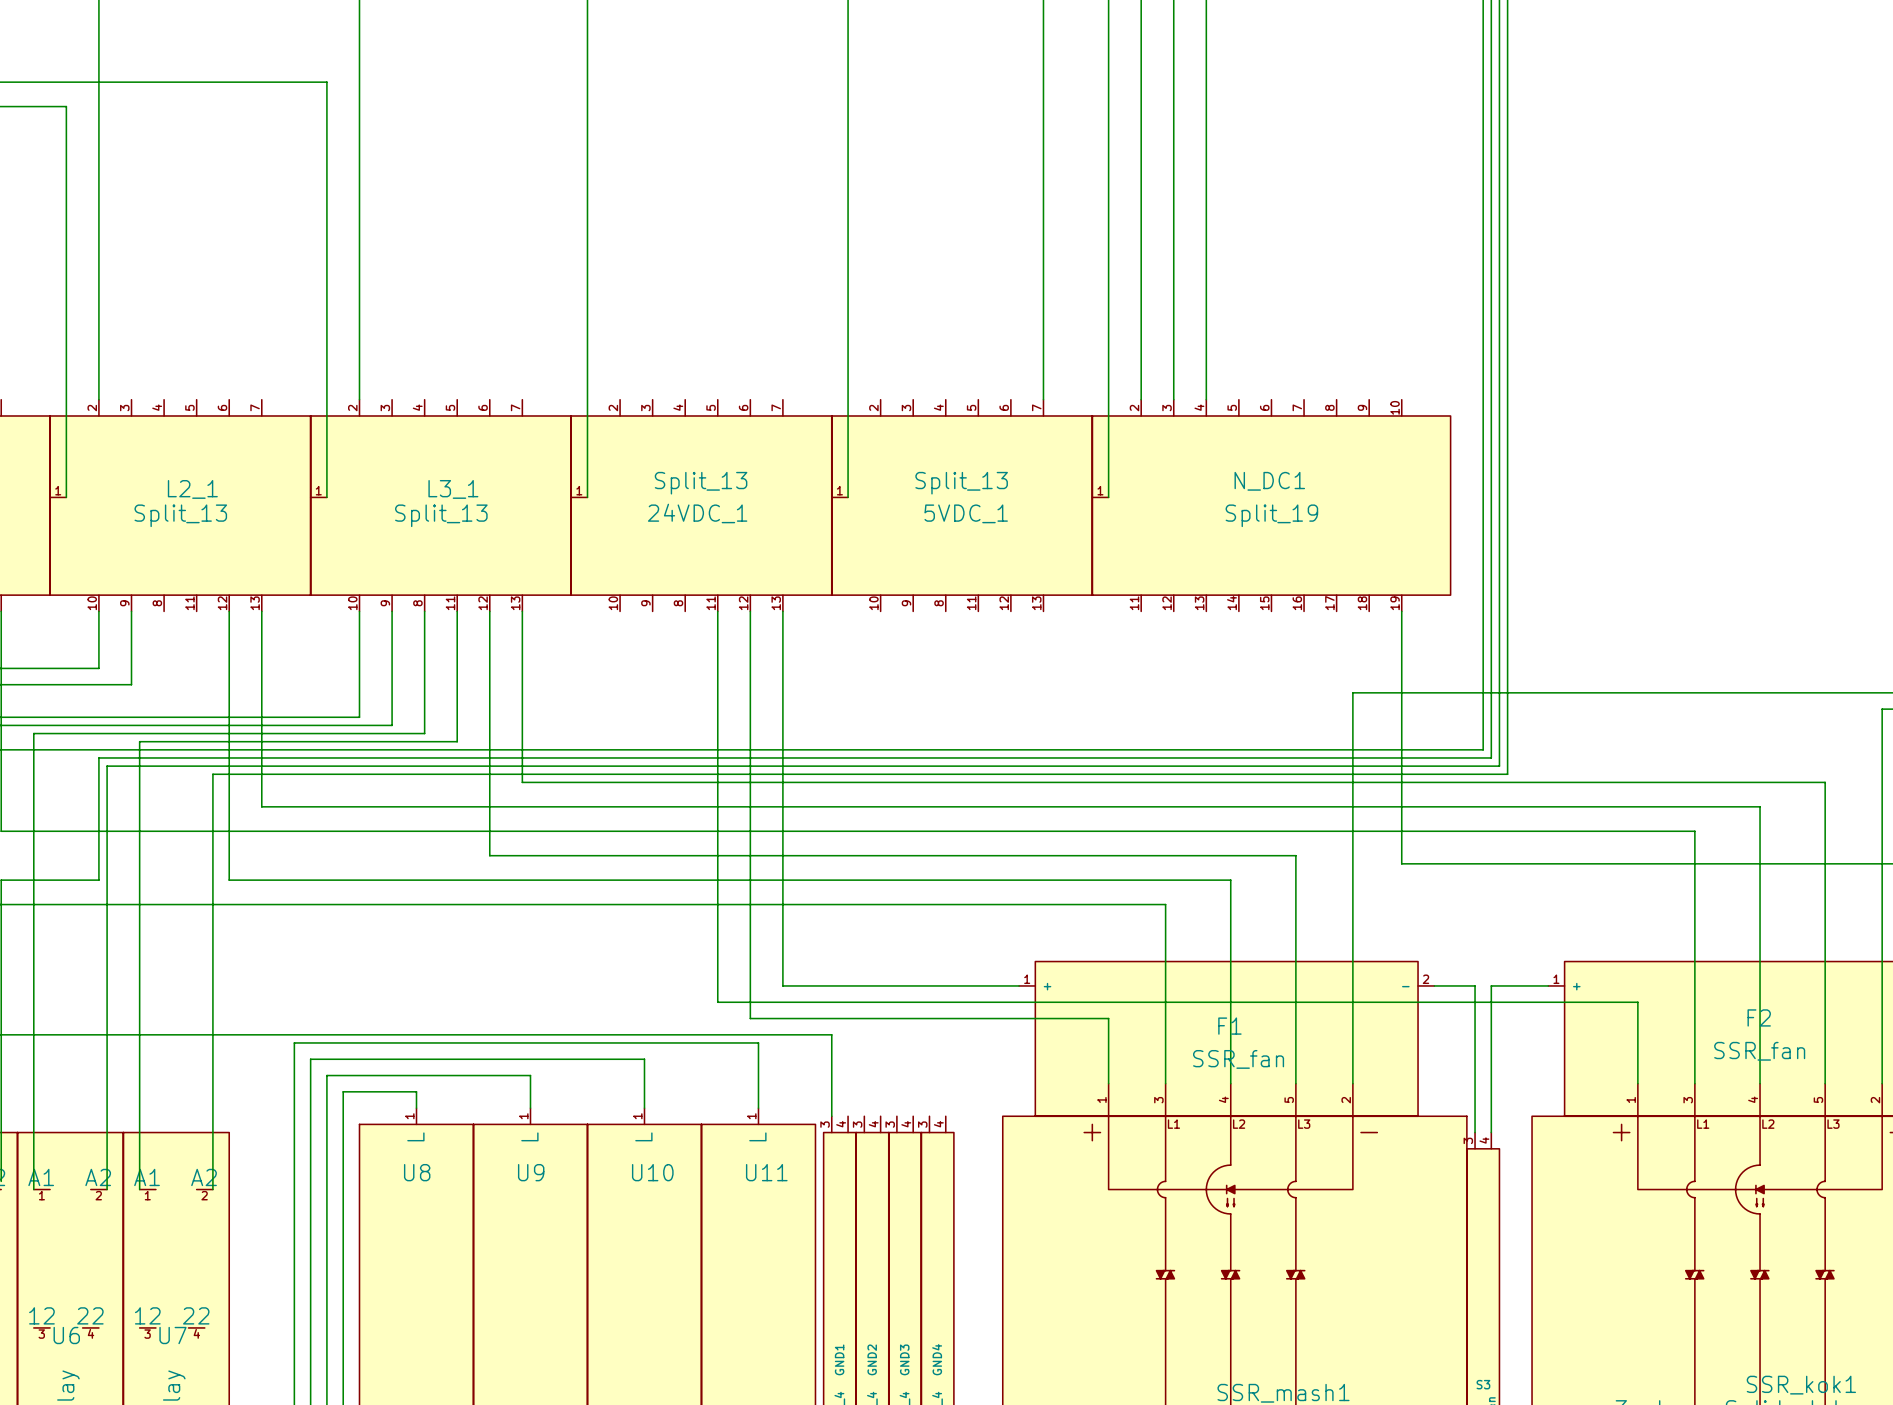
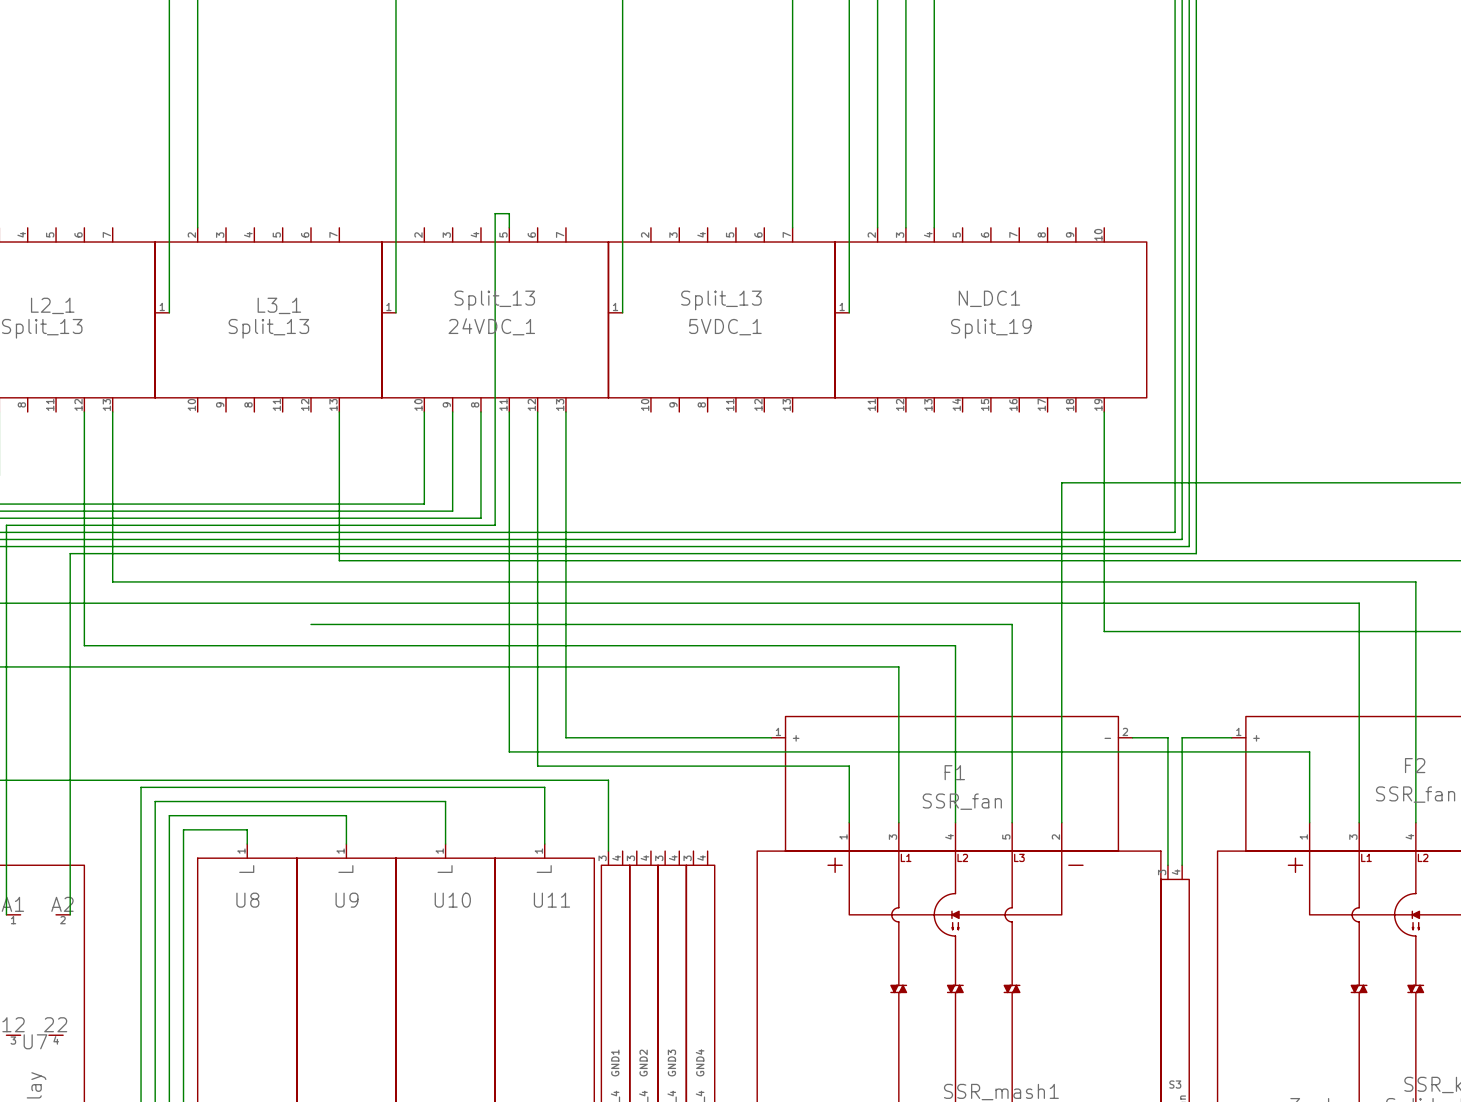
wire: (359, 611) (359, 717) -> (424, 411) (424, 504) (197, 504)
wire: (392, 611) (392, 725) -> (452, 411) (452, 511) (226, 511)
wire: (424, 611) (424, 733) -> (480, 411) (480, 518) (254, 518)
wire: (457, 611) (457, 741) -> (509, 227) (509, 213) (495, 213) (495, 525) (282, 525)
wire: (489, 611) (489, 855) -> none

